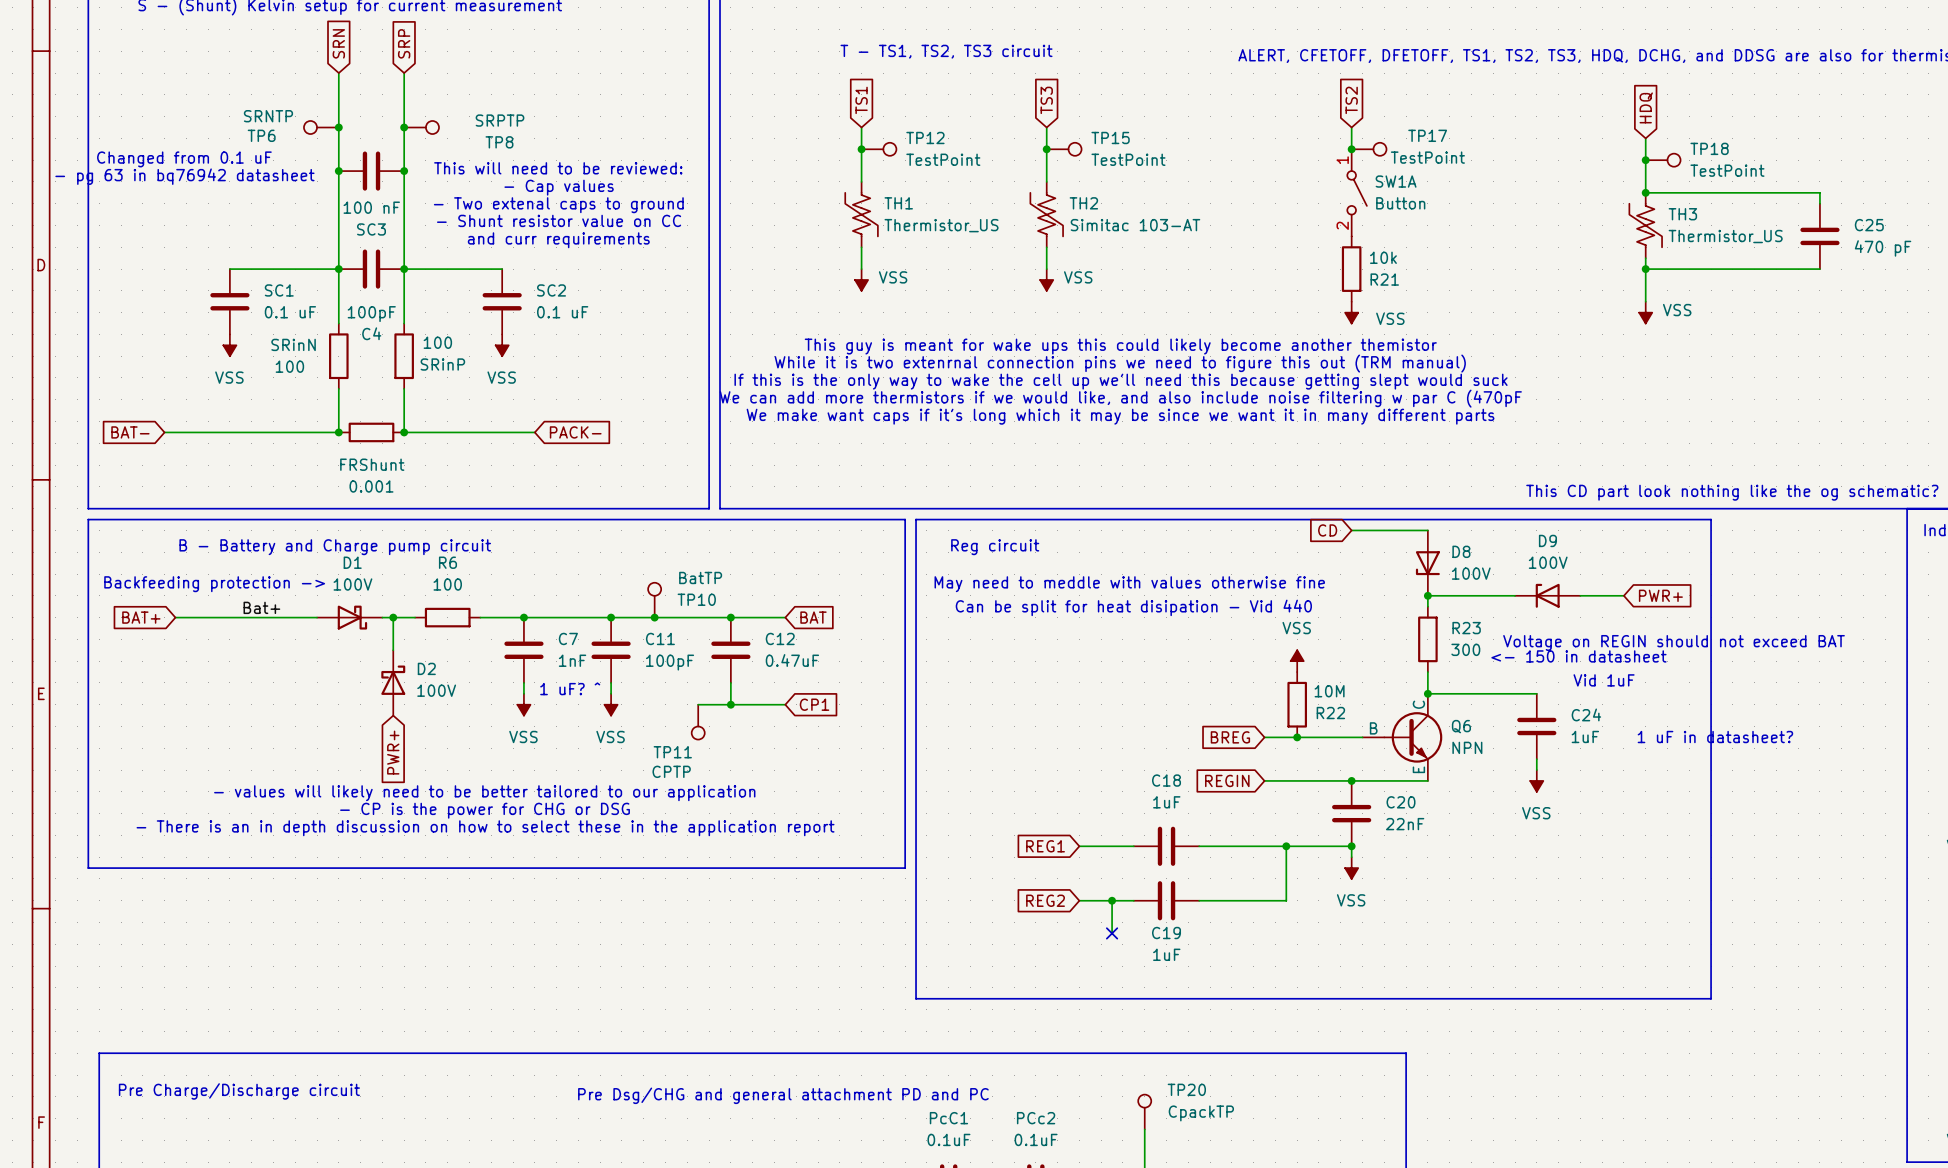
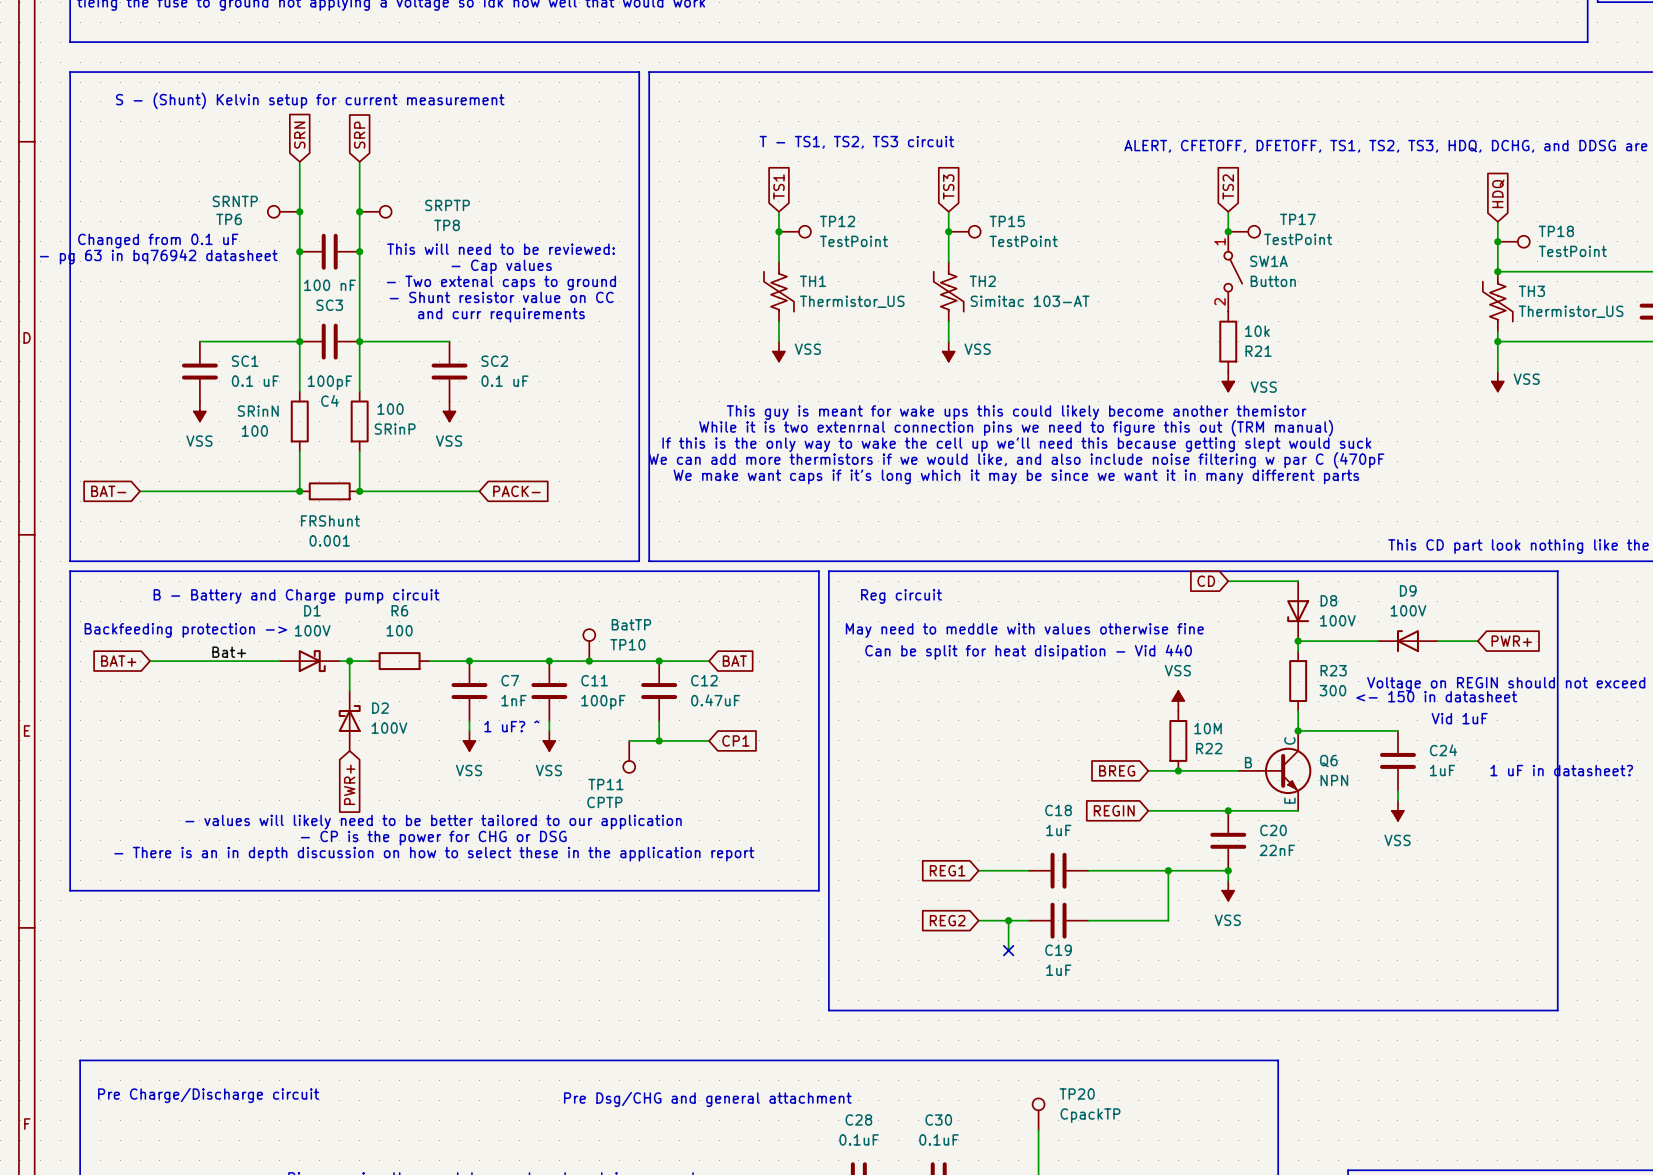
text: Pre Dsg/CHG and general attachment PD and PC (783, 1095) -> Pre Dsg/CHG and general attachment (707, 1099)
PcC1 name: PcC1 (948, 1118) -> C28 (858, 1119)
PCc2 name: PCc2 (1036, 1118) -> C30 (938, 1119)

